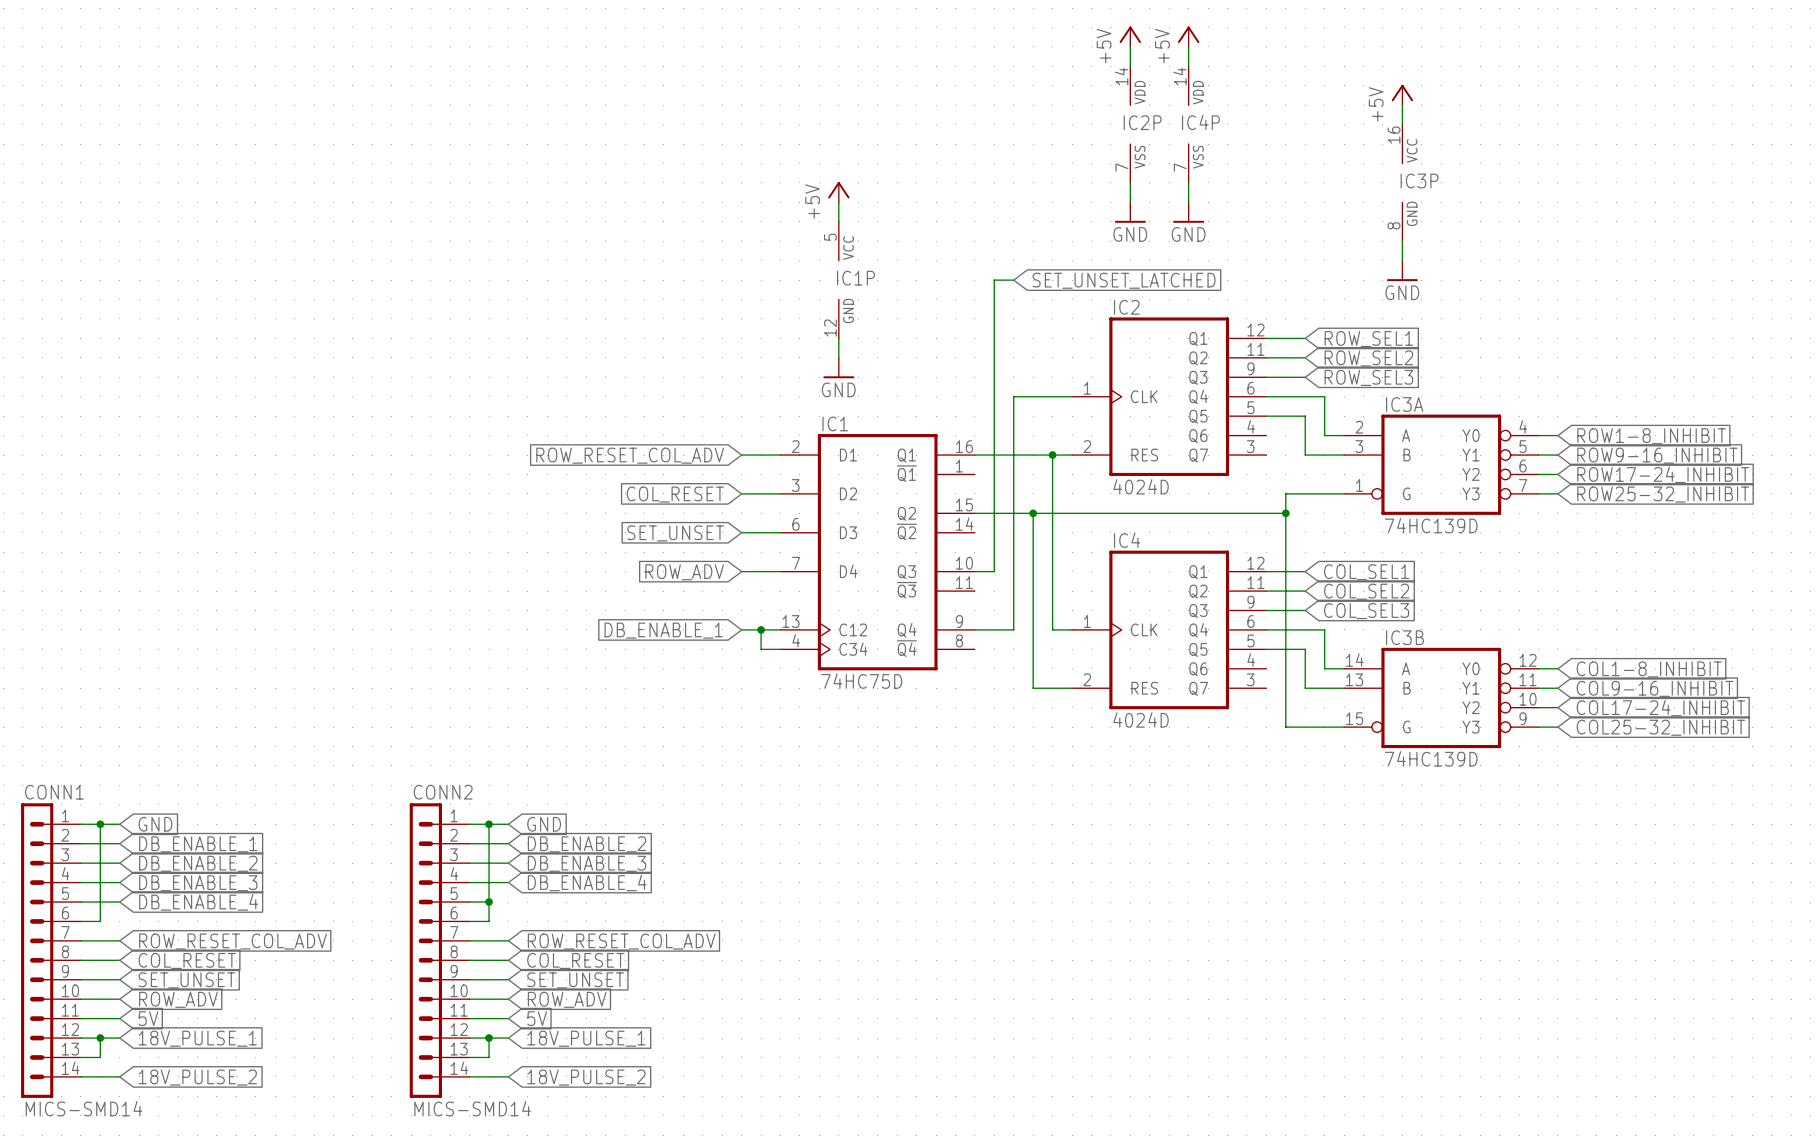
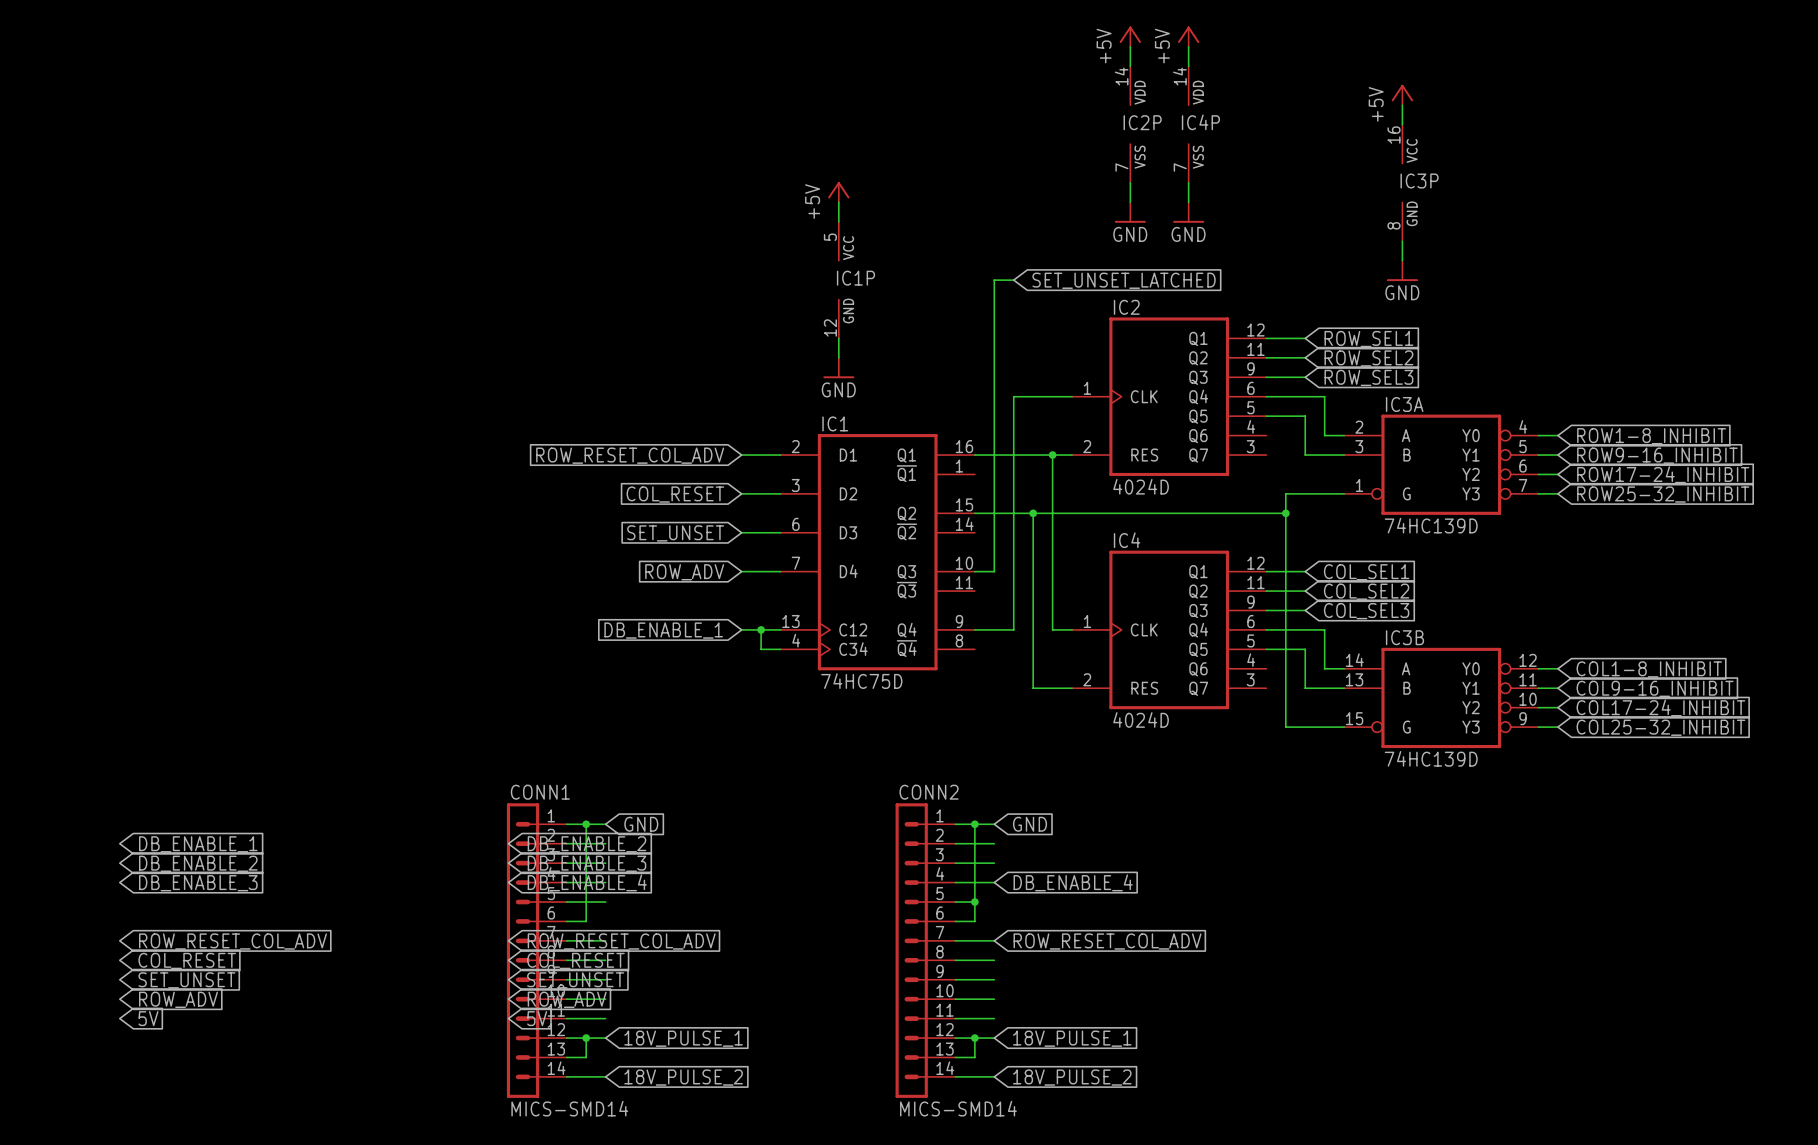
wire: (80, 824) (119, 824) -> none
wire: (100, 824) (100, 921) (80, 921) -> none
junction: (100, 824) -> none
global label: GND (155, 824) -> none
wire: (469, 824) (508, 824) -> (566, 824) (605, 824)
wire: (489, 824) (489, 921) (469, 921) -> (586, 824) (586, 921) (566, 921)
junction: (489, 824) -> none
global label position: GND (544, 824) -> GND (641, 824)
junction: none -> (586, 824)
wire: none -> (955, 824) (994, 824)
wire: none -> (974, 824) (974, 921) (955, 921)
junction: none -> (974, 824)
global label: none -> GND (1030, 824)
wire: (80, 843) (119, 843) -> none
wire: (469, 843) (508, 843) -> (566, 843) (605, 843)
wire: none -> (955, 843) (994, 843)
wire: (80, 863) (119, 863) -> none
wire: (469, 863) (508, 863) -> (566, 863) (605, 863)
wire: none -> (955, 863) (994, 863)
wire: (80, 882) (119, 882) -> none
wire: (469, 882) (508, 882) -> (566, 882) (605, 882)
wire: none -> (955, 882) (994, 882)
global label: none -> DB_ENABLE_4 (1073, 882)
wire: (80, 902) (119, 902) -> none
global label: DB_ENABLE_4 (198, 902) -> none
wire: (469, 902) (489, 902) -> none
junction: (489, 902) -> none
wire: none -> (566, 902) (605, 902)
wire: none -> (955, 902) (974, 902)
junction: none -> (974, 902)
wire: (80, 940) (119, 940) -> none
wire: (469, 940) (508, 940) -> (566, 940) (605, 940)
wire: none -> (955, 940) (994, 940)
global label: none -> ROW_RESET_COL_ADV (1107, 941)
CONN1 position: (50, 950) -> (536, 950)
CONN2 position: (439, 950) -> (925, 950)
wire: (80, 960) (119, 960) -> none
wire: (469, 960) (508, 960) -> (566, 960) (605, 960)
wire: none -> (955, 960) (994, 960)
wire: (80, 979) (119, 979) -> none
wire: (469, 979) (508, 979) -> (566, 979) (605, 979)
wire: none -> (955, 979) (994, 979)
wire: (80, 999) (119, 999) -> none
wire: (469, 999) (508, 999) -> (566, 999) (605, 999)
wire: none -> (955, 999) (994, 999)
wire: (80, 1018) (119, 1018) -> none
wire: (469, 1018) (508, 1018) -> (566, 1018) (605, 1018)
wire: none -> (955, 1018) (994, 1018)
wire: (80, 1038) (119, 1038) -> none
wire: (100, 1038) (100, 1057) (80, 1057) -> none
junction: (100, 1038) -> none
global label: 18V_PULSE_1 (197, 1038) -> none
wire: (469, 1038) (508, 1038) -> (566, 1038) (605, 1038)
wire: (489, 1038) (489, 1057) (469, 1057) -> (586, 1038) (586, 1057) (566, 1057)
junction: (489, 1038) -> none
junction: none -> (586, 1038)
global label position: 18V_PULSE_1 (586, 1038) -> 18V_PULSE_1 (683, 1038)
wire: none -> (955, 1038) (994, 1038)
wire: none -> (974, 1038) (974, 1057) (955, 1057)
junction: none -> (974, 1038)
global label: none -> 18V_PULSE_1 (1072, 1038)
wire: (80, 1076) (119, 1076) -> none
wire: (469, 1076) (508, 1076) -> (566, 1076) (605, 1076)
wire: none -> (955, 1076) (994, 1076)
global label: 18V_PULSE_2 (197, 1077) -> none
global label position: 18V_PULSE_2 (586, 1077) -> 18V_PULSE_2 (683, 1077)
global label: none -> 18V_PULSE_2 (1072, 1077)

